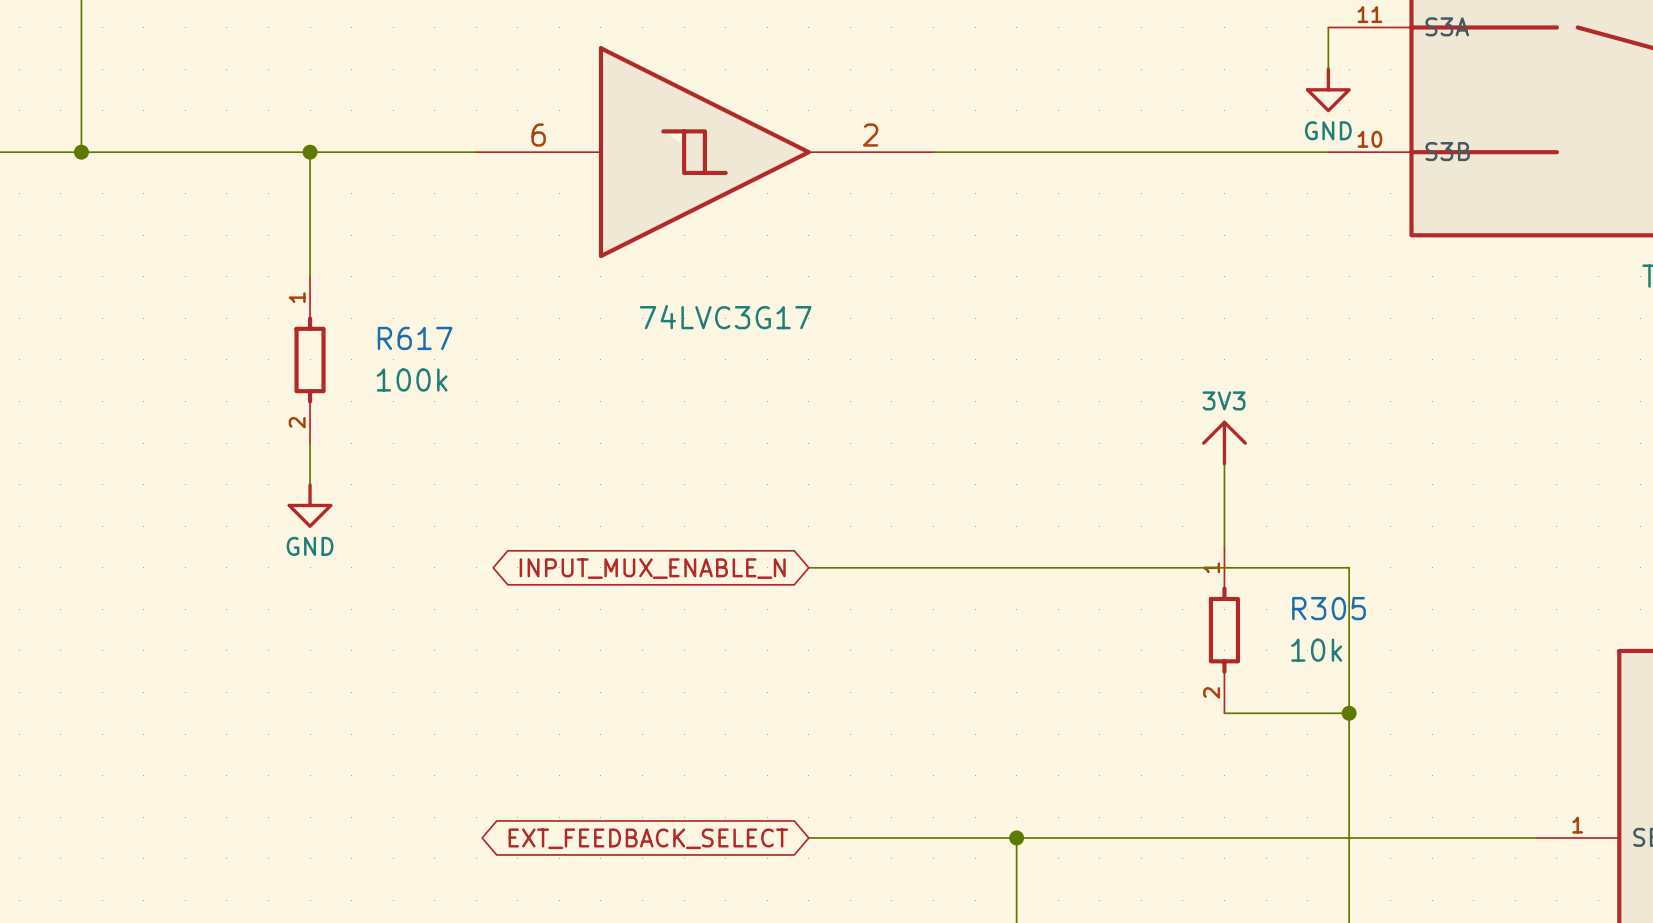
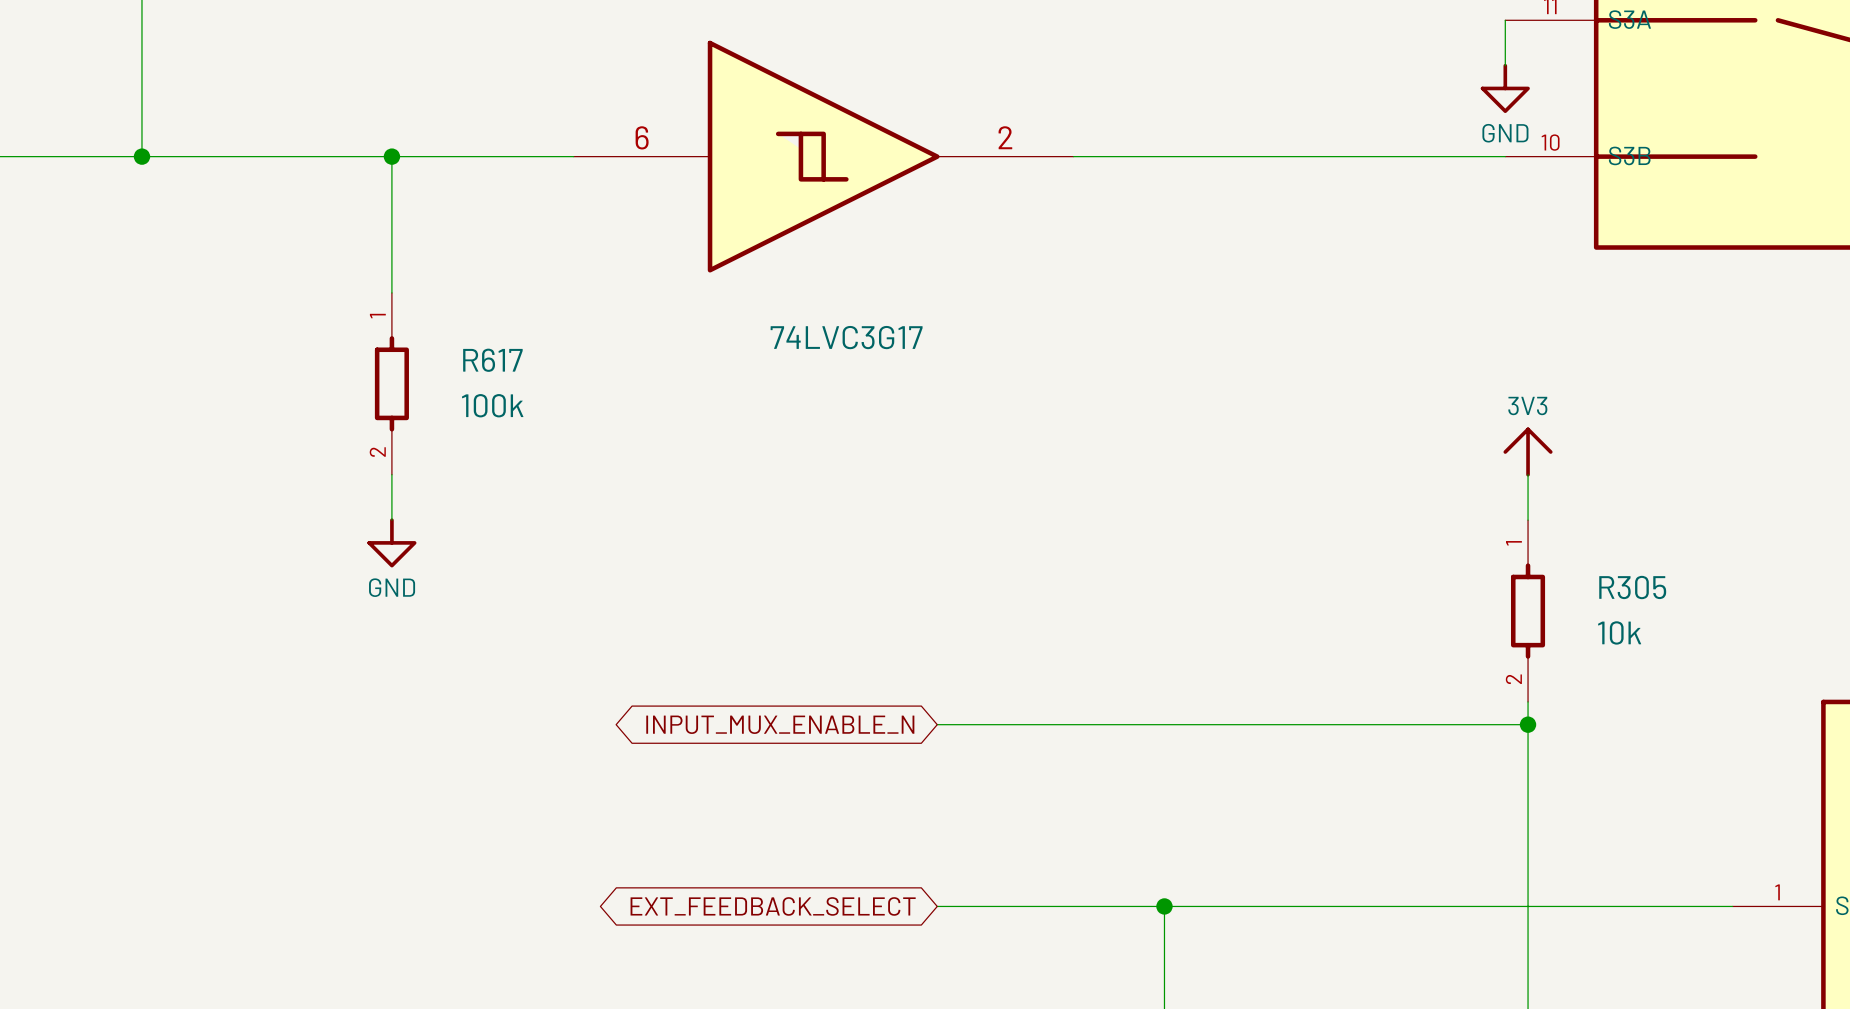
power symbol position: 3V3 (1224, 443) -> 3V3 (1528, 452)
wire: none -> (1528, 474) (1528, 520)
wire: (1224, 463) (1224, 547) -> none
wire: (808, 567) (1349, 567) (1349, 650) -> none
global label position: INPUT_MUX_ENABLE_N (652, 568) -> INPUT_MUX_ENABLE_N (780, 724)
R305 position: (1224, 630) -> (1528, 611)
wire: none -> (937, 724) (1528, 724)
wire: (1224, 713) (1349, 713) -> none
junction position: (1349, 713) -> (1528, 724)

